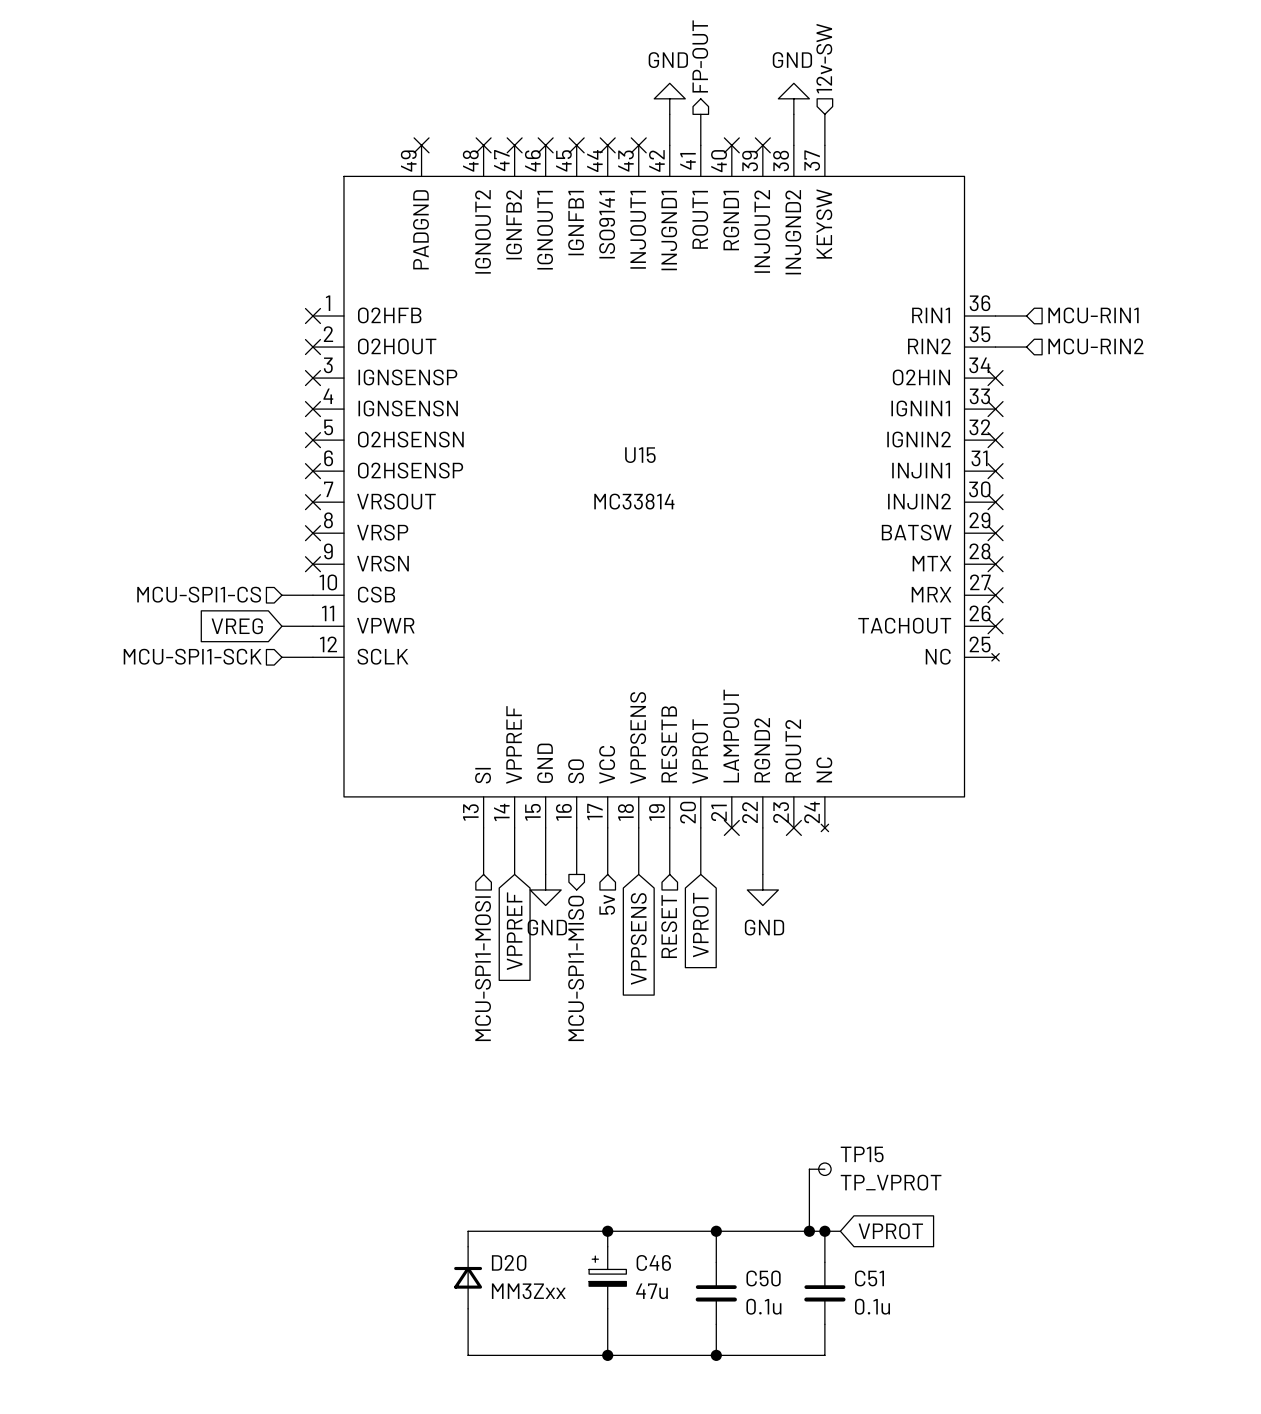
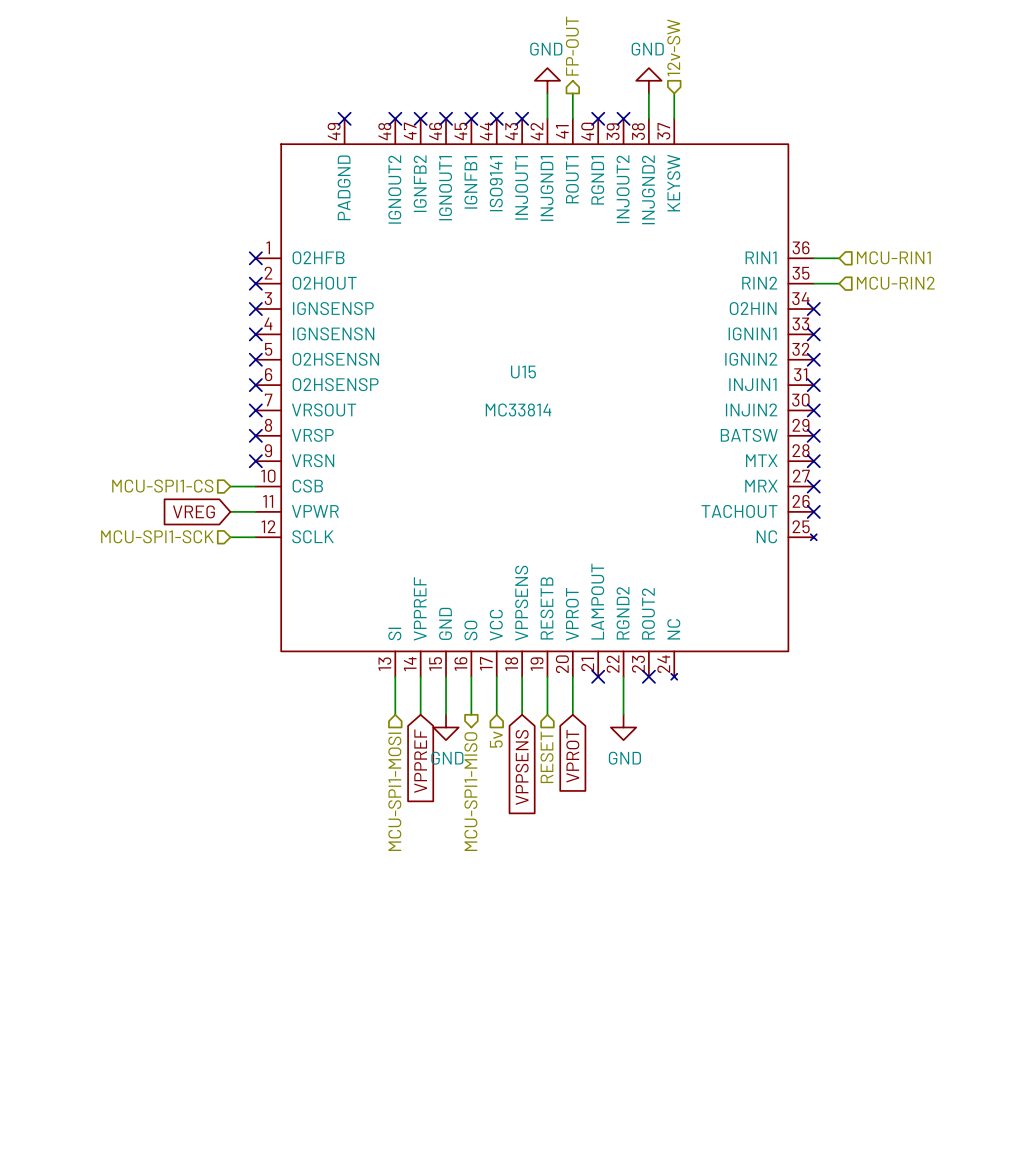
wire: (824, 1169) (809, 1169) (809, 1231) -> none
TP15: TP_VPROT (824, 1169) -> none
wire: (607, 1231) (607, 1246) -> none
junction: (607, 1231) -> none
wire: (716, 1231) (716, 1262) -> none
junction: (716, 1231) -> none
junction: (809, 1231) -> none
wire: (824, 1231) (824, 1262) -> none
junction: (824, 1231) -> none
wire: (840, 1231) (468, 1231) (468, 1246) -> none
global label: VPROT (890, 1231) -> none
D20: MM3Zxx (468, 1277) -> none
C46: 47u (607, 1277) -> none
C50: 0.1u (716, 1293) -> none
C51: 0.1u (824, 1293) -> none
wire: (468, 1308) (468, 1355) (824, 1355) (824, 1324) -> none
wire: (607, 1308) (607, 1355) -> none
wire: (716, 1324) (716, 1355) -> none
junction: (607, 1355) -> none
junction: (716, 1355) -> none

